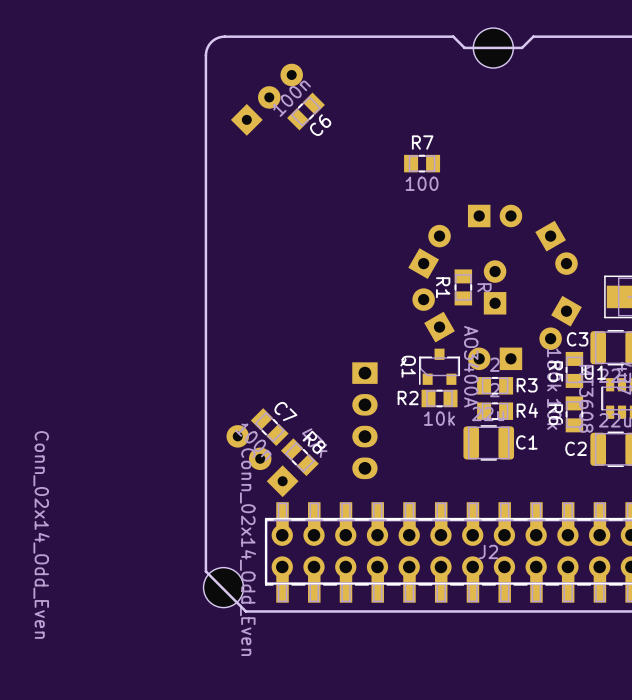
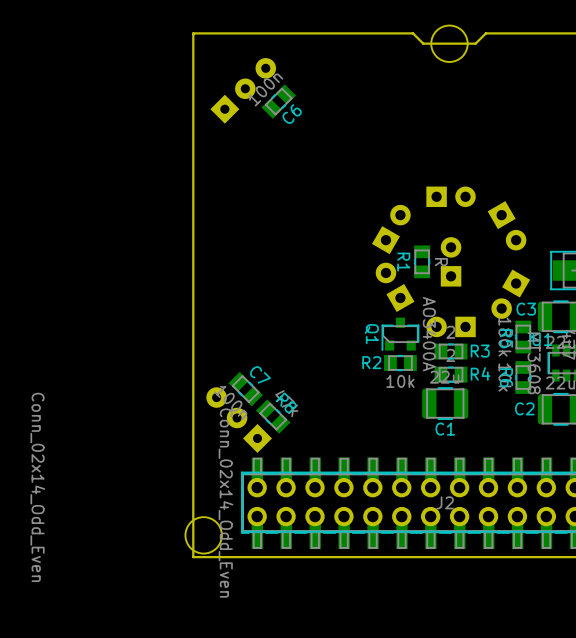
board edge: (224, 36) (211, 42) (205, 55) (205, 571) (245, 611) -> (204, 33) (193, 33) (193, 557) (224, 557)
R7: 100 (422, 163) -> none
part: (364, 420) -> none
C1 name position: C1 (526, 442) -> C1 (445, 429)

